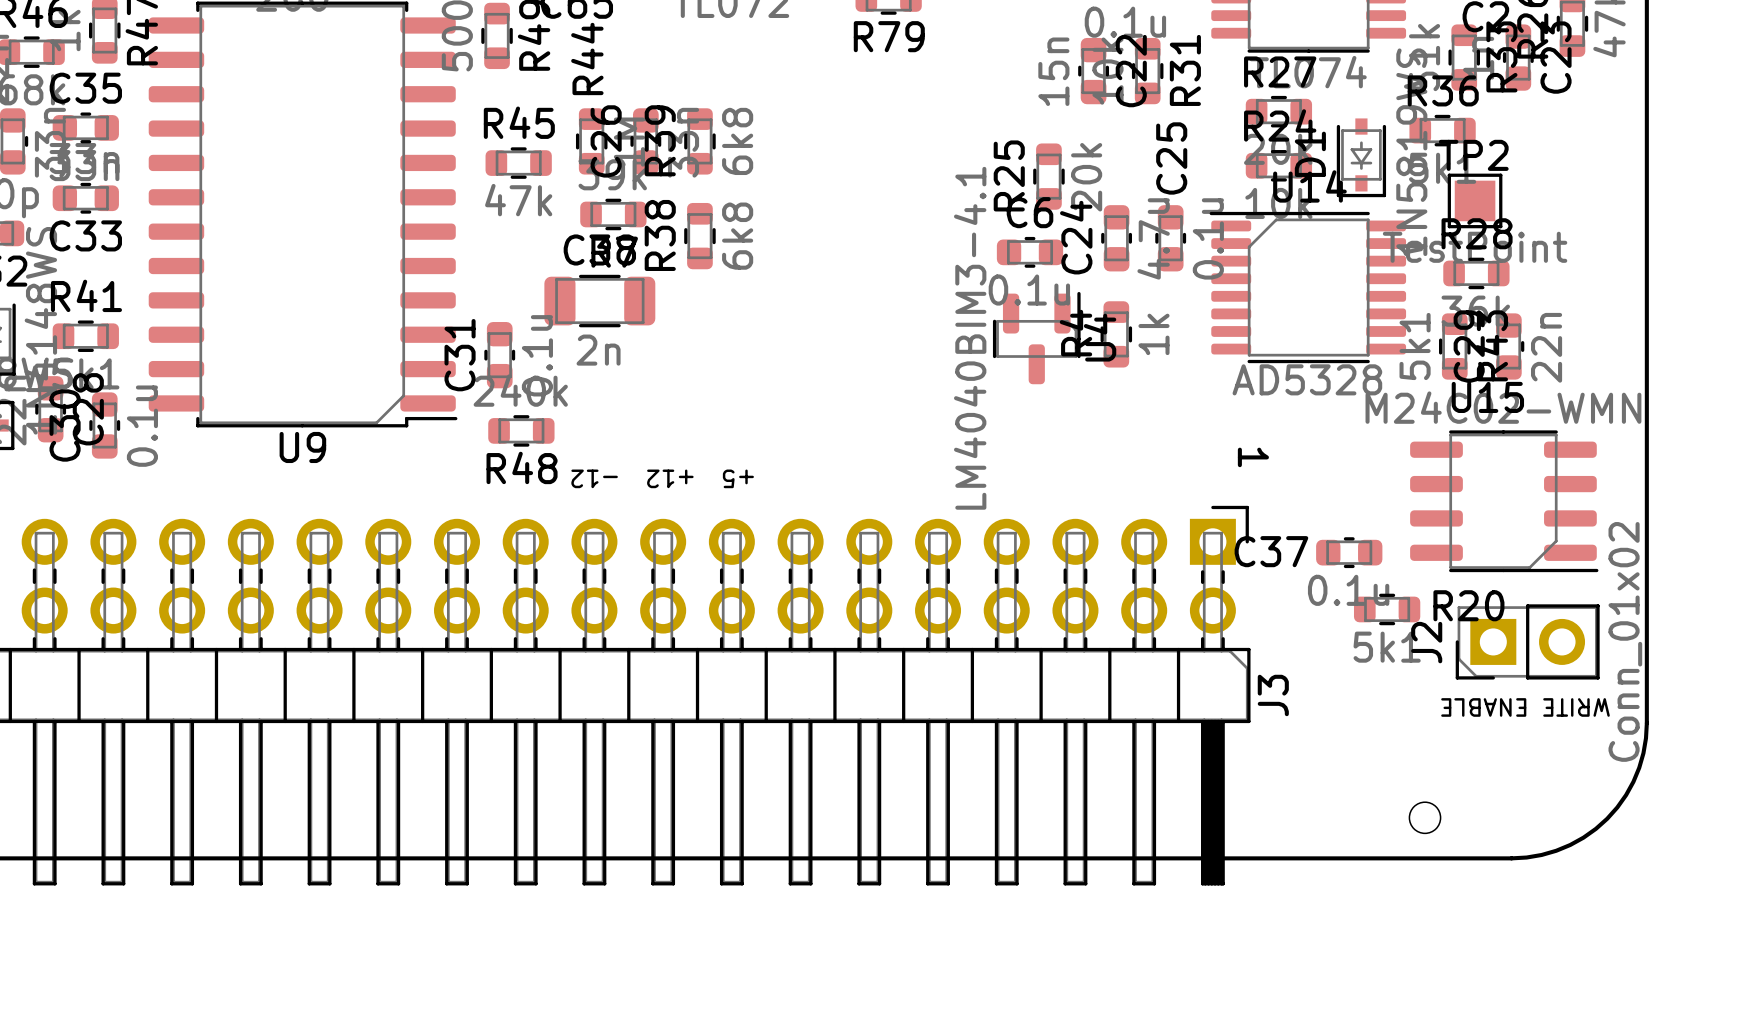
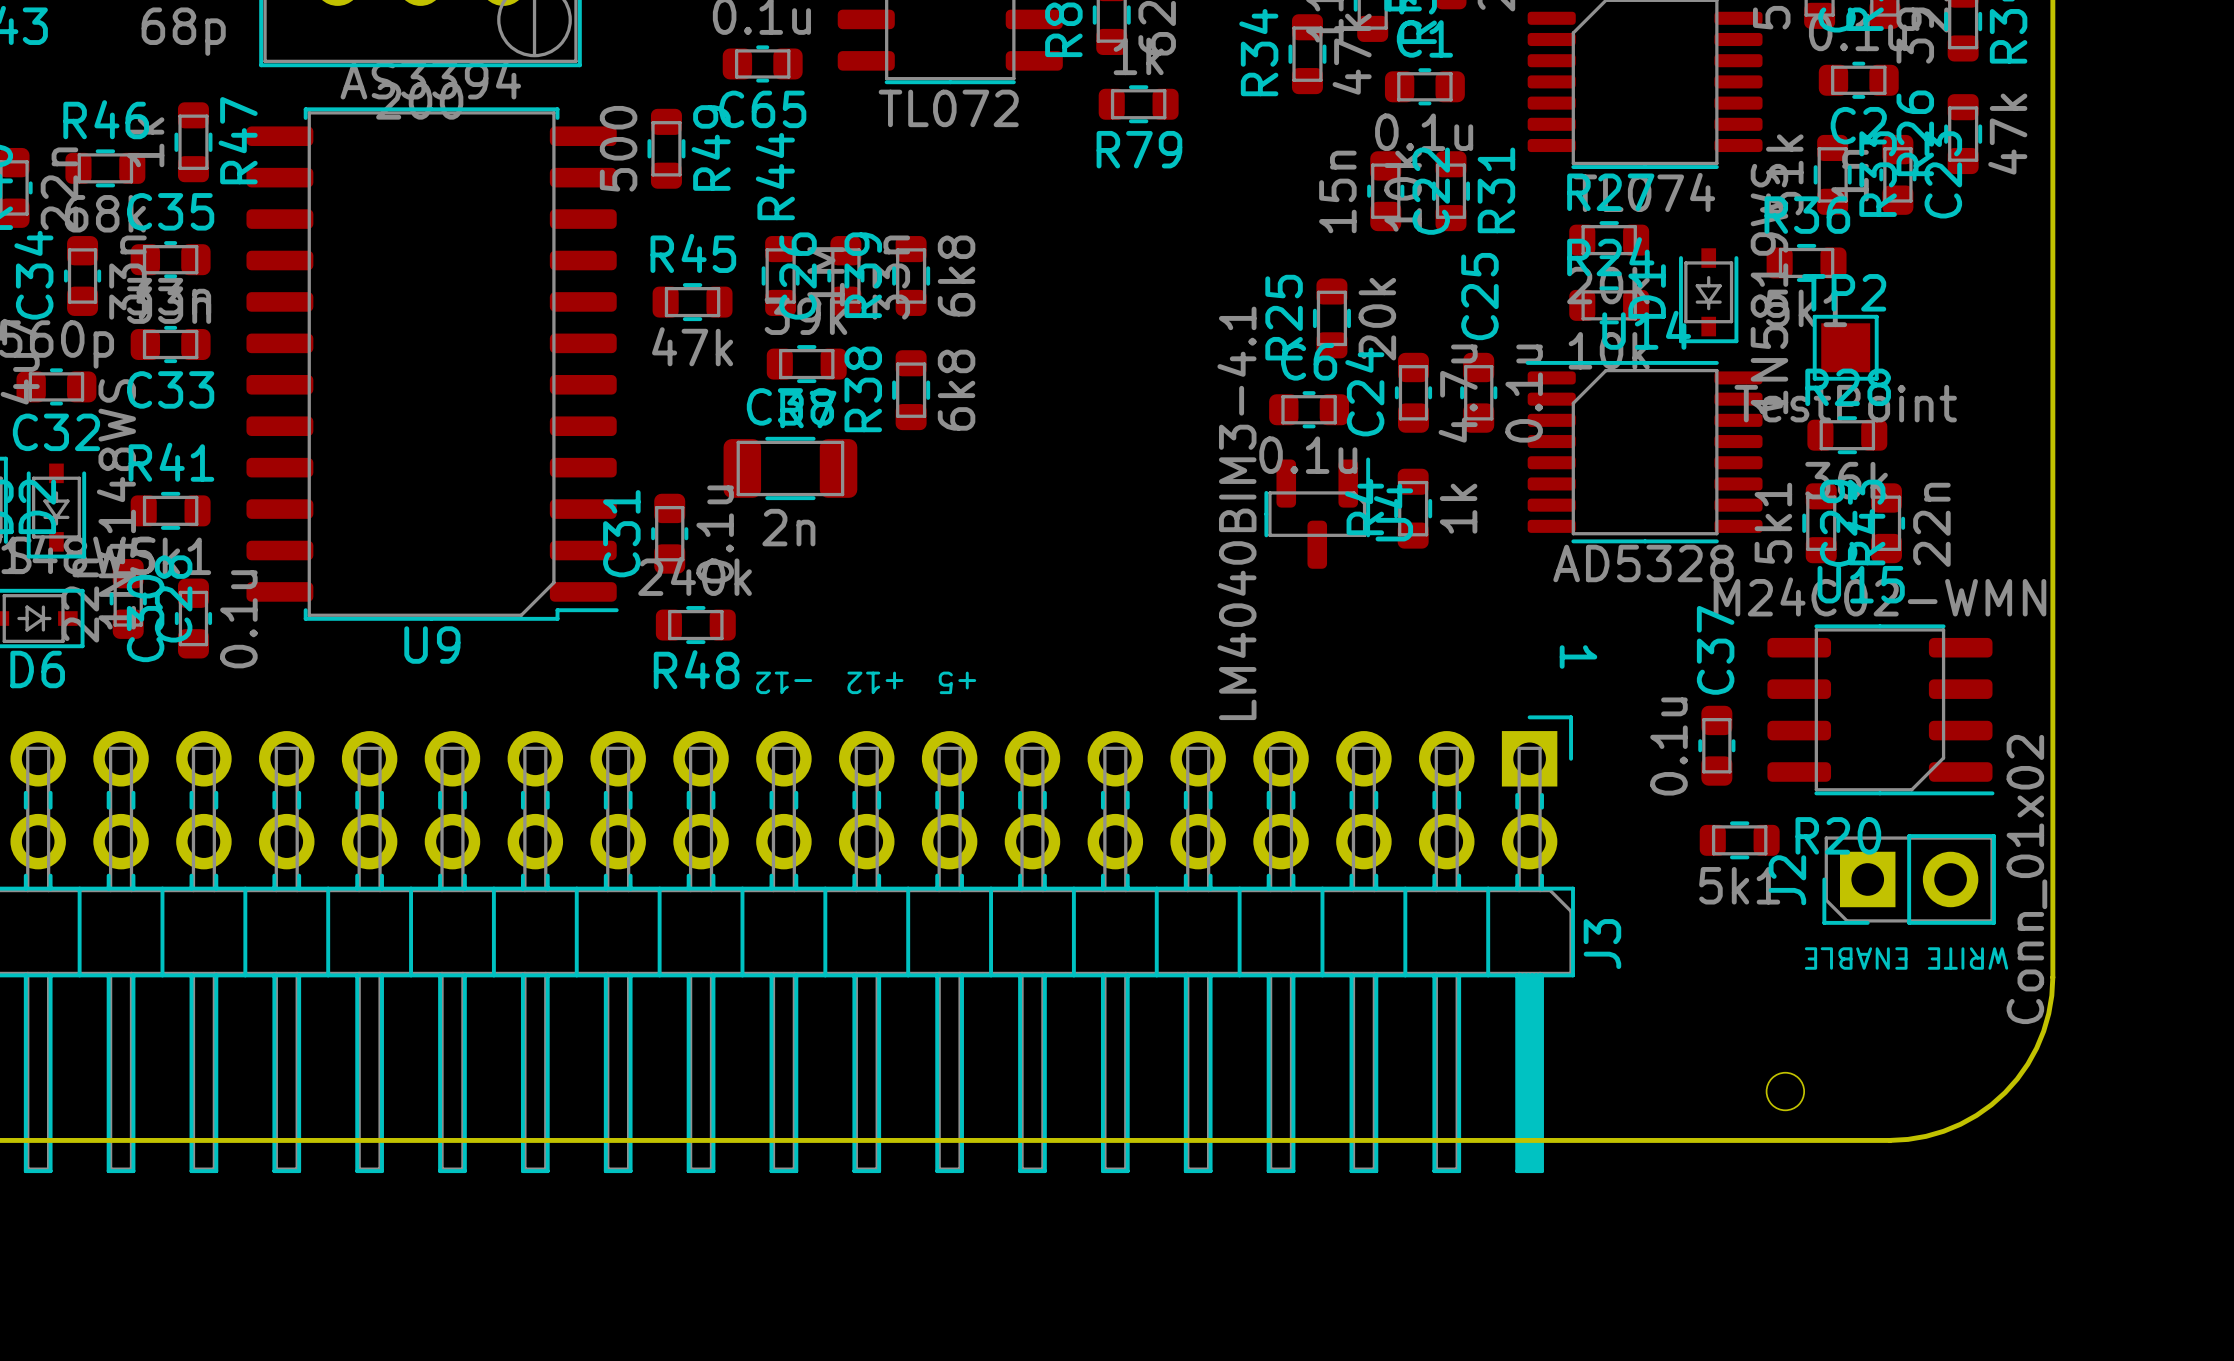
C37 rotation: 0° (1349, 552) -> 90° clockwise (1716, 745)

